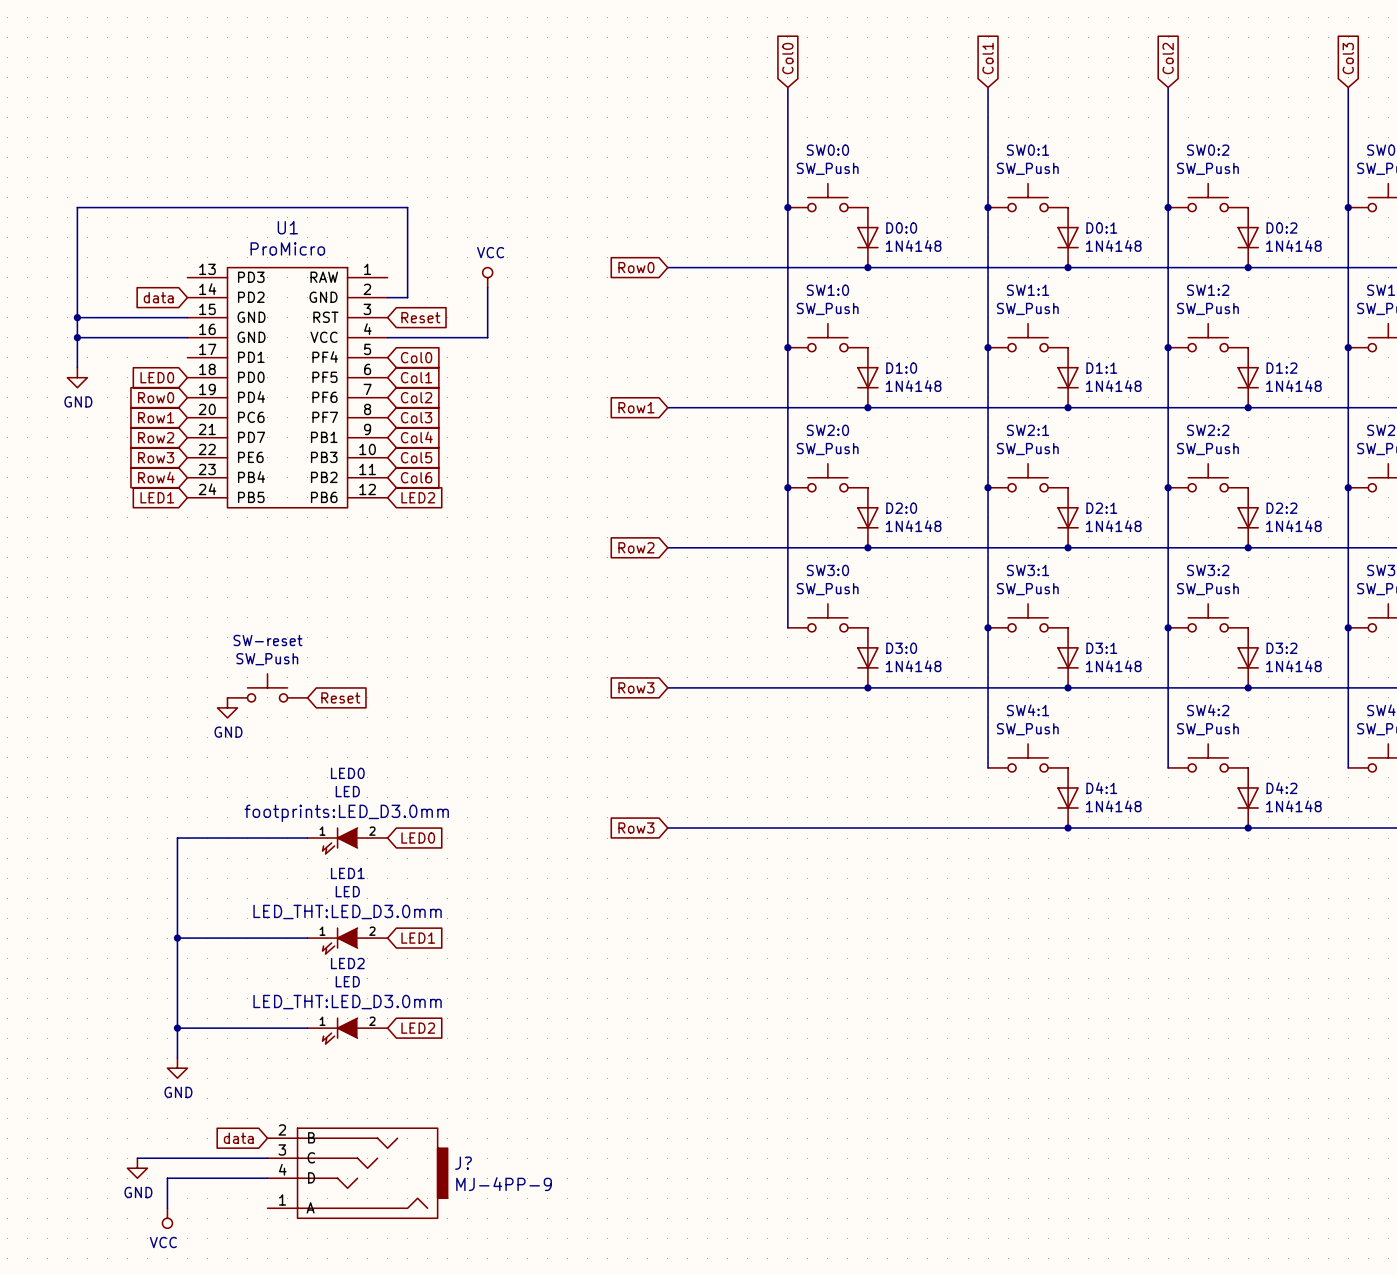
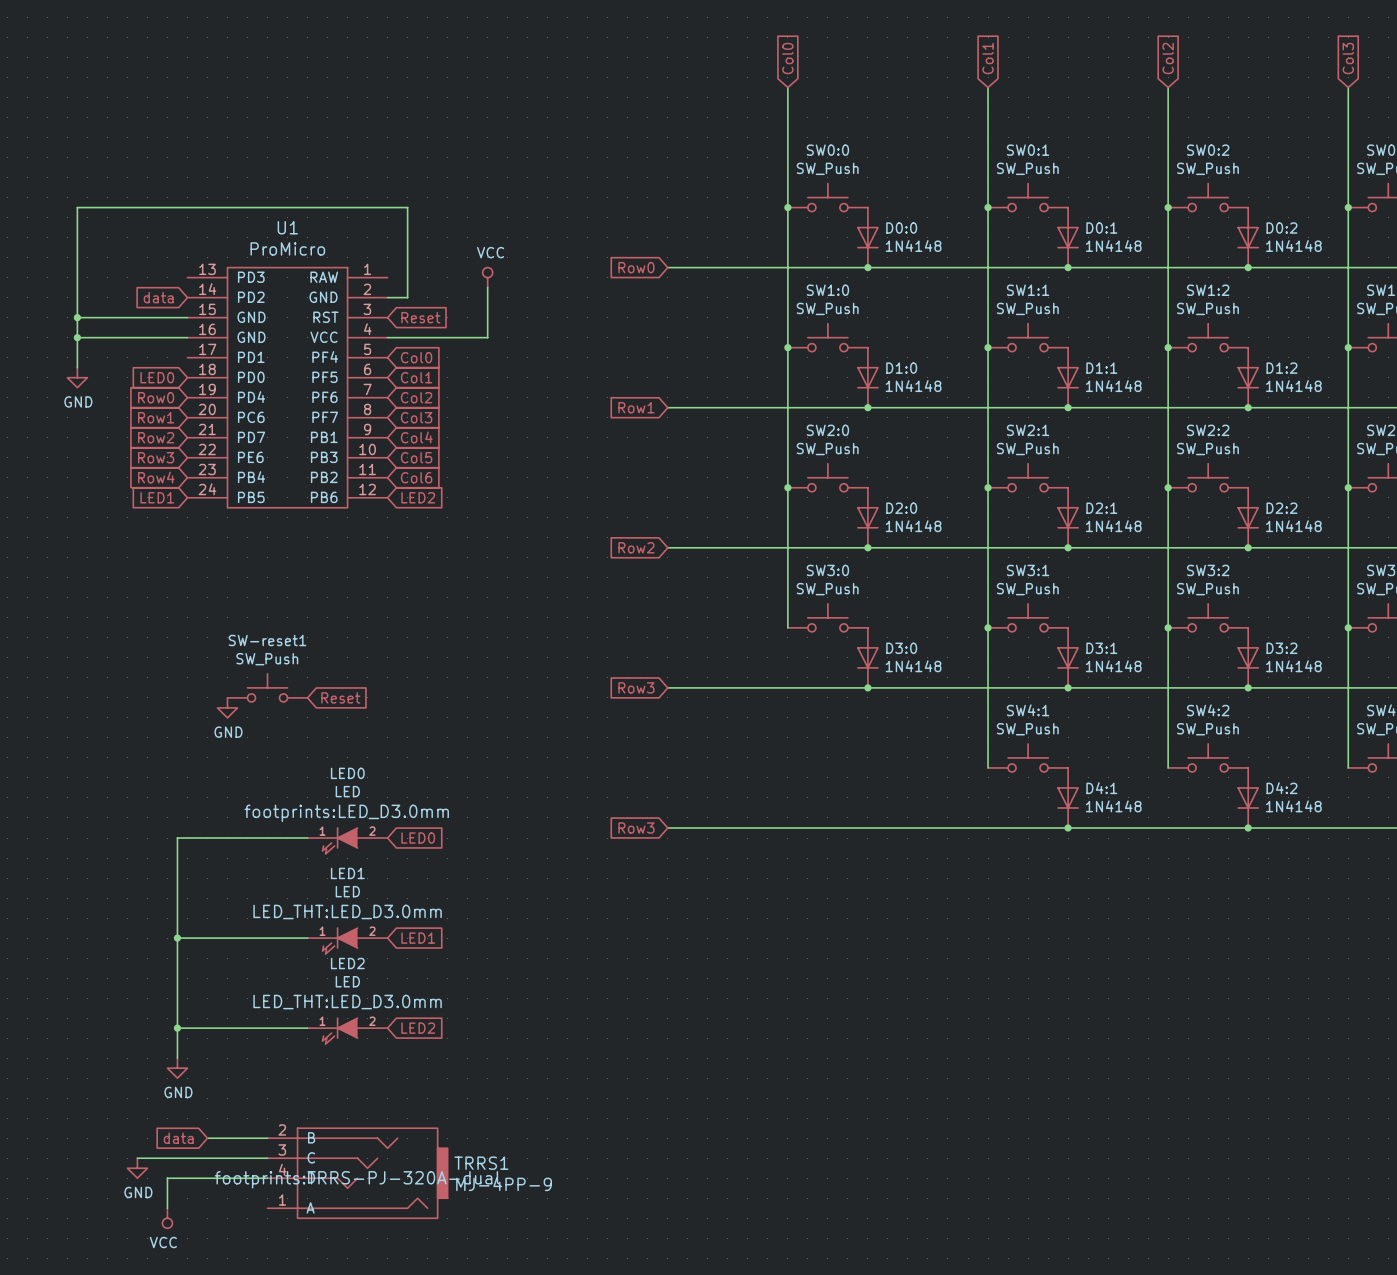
SW-reset name: SW-reset (267, 640) -> SW-reset1 (267, 640)
wire: none -> (207, 1138) (267, 1138)
global label position: data (238, 1138) -> data (178, 1138)
J? name: J? (463, 1163) -> TRRS1 (481, 1163)
J? text: none -> footprints:TRRS-PJ-320A-dual (357, 1179)

